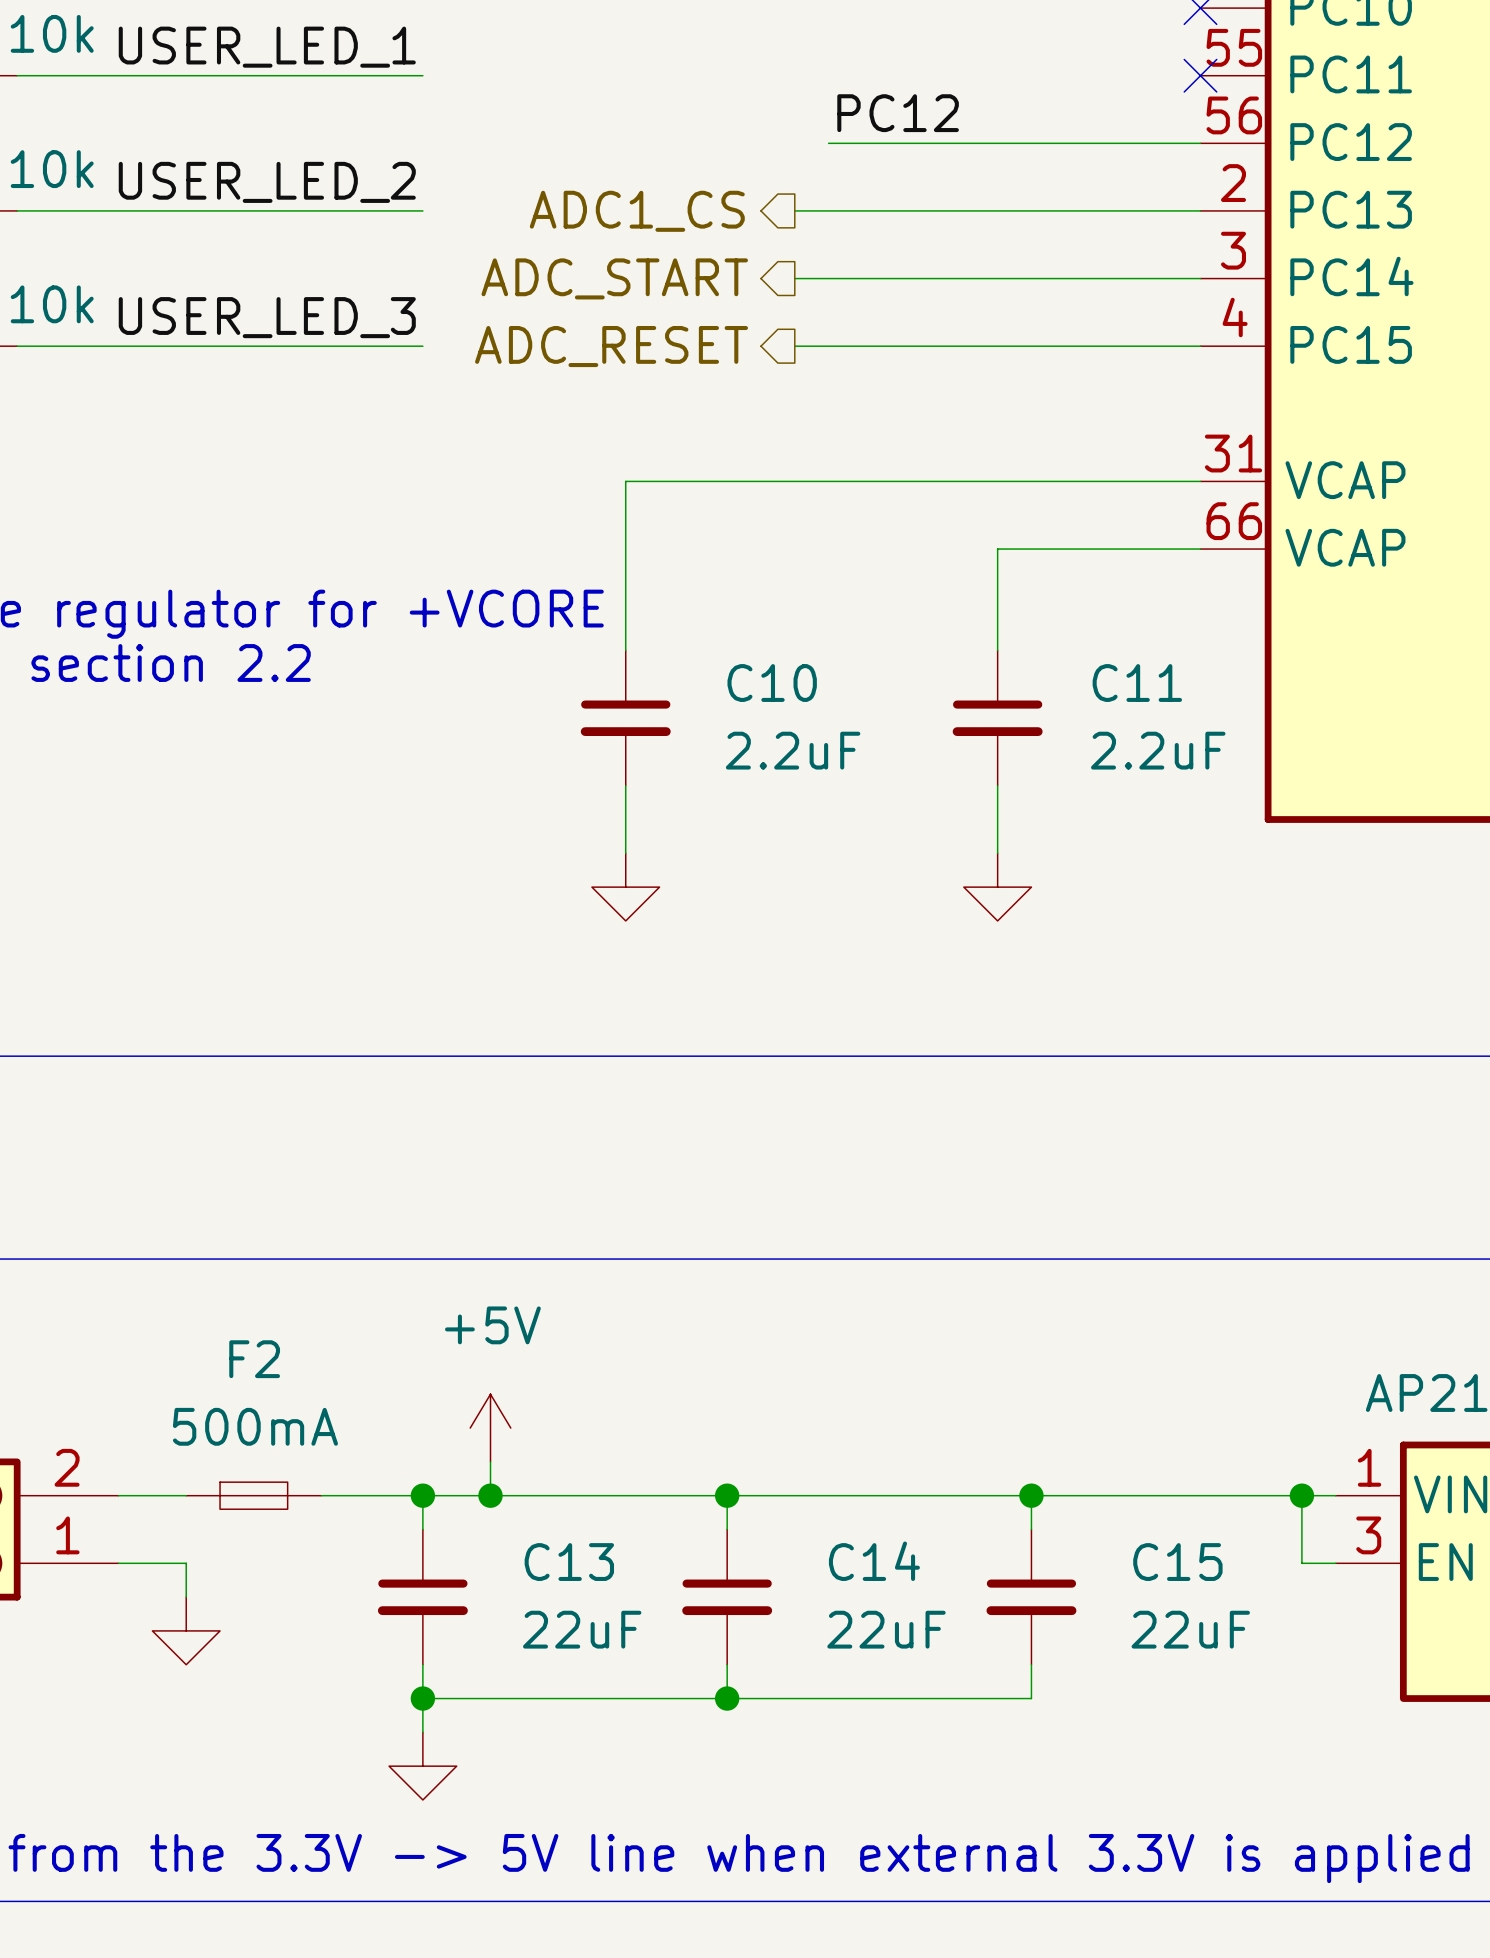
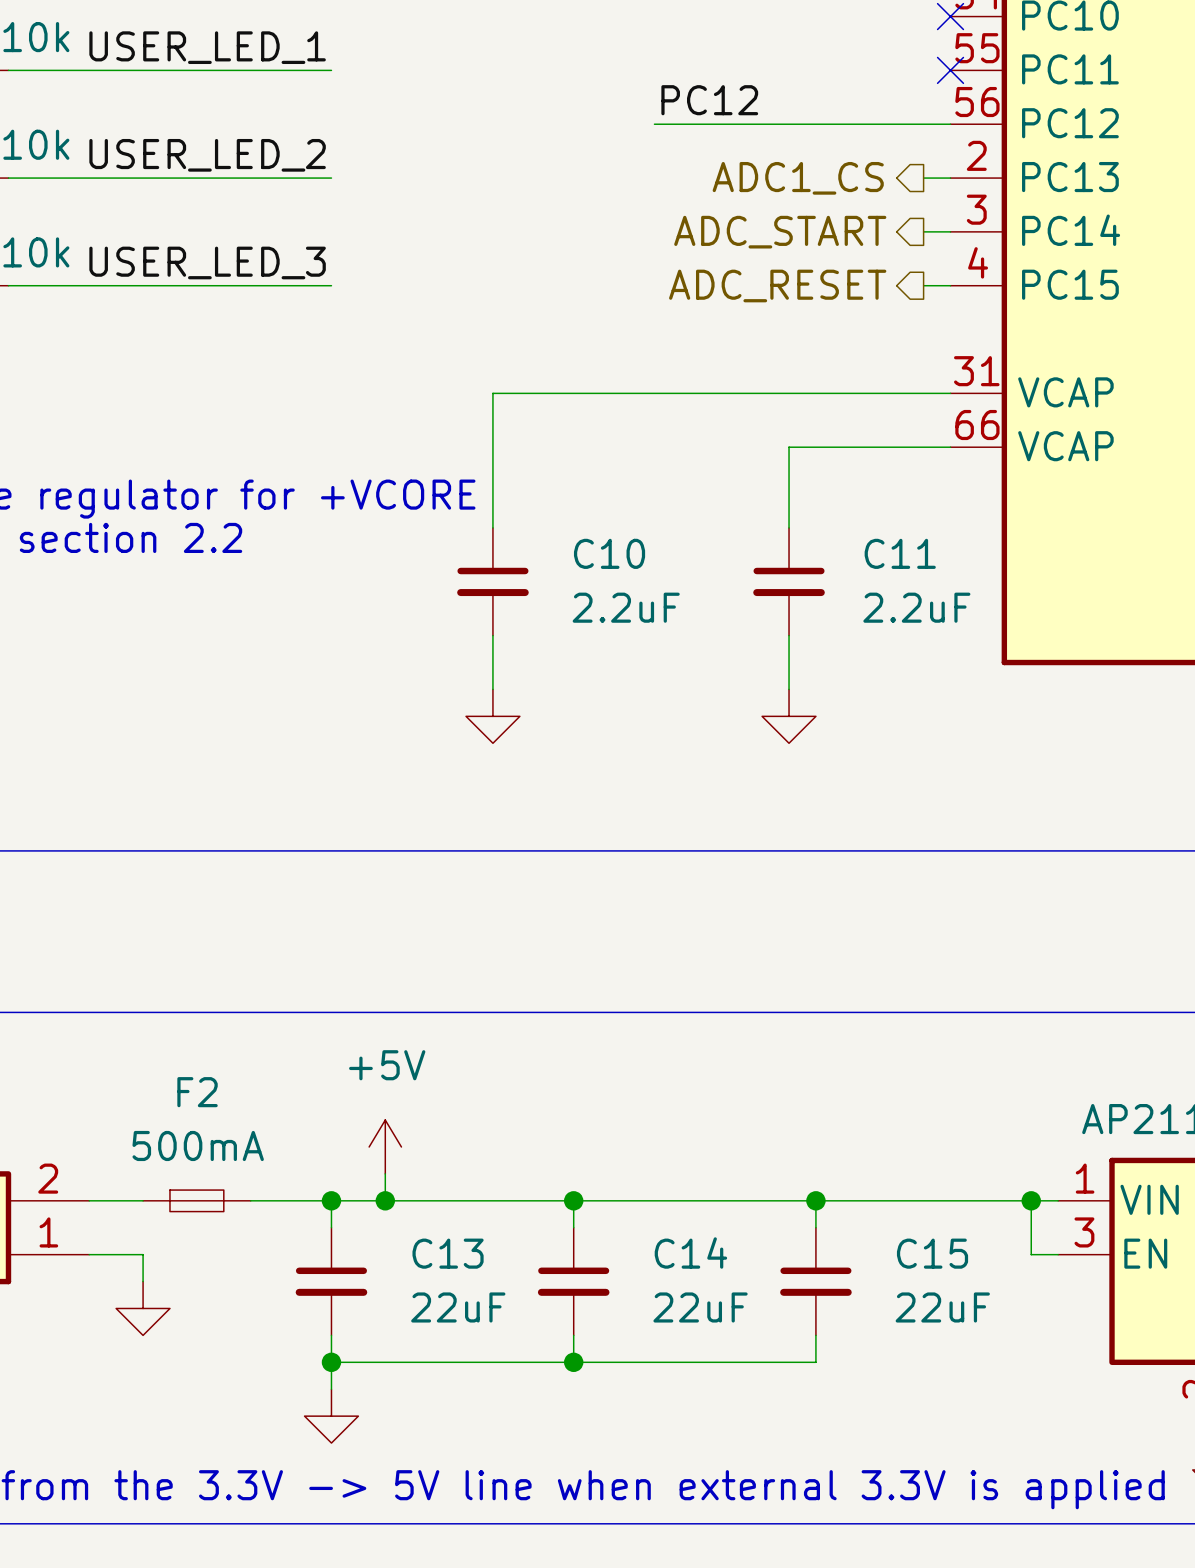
wire: (794, 210) (1166, 210) -> none
hierarchical label position: ADC1_CS (637, 211) -> ADC1_CS (798, 178)
hierarchical label position: ADC_START (614, 278) -> ADC_START (780, 232)
wire: (794, 278) (1166, 278) -> none
hierarchical label position: ADC_RESET (611, 346) -> ADC_RESET (777, 285)
wire: (794, 346) (1166, 346) -> none

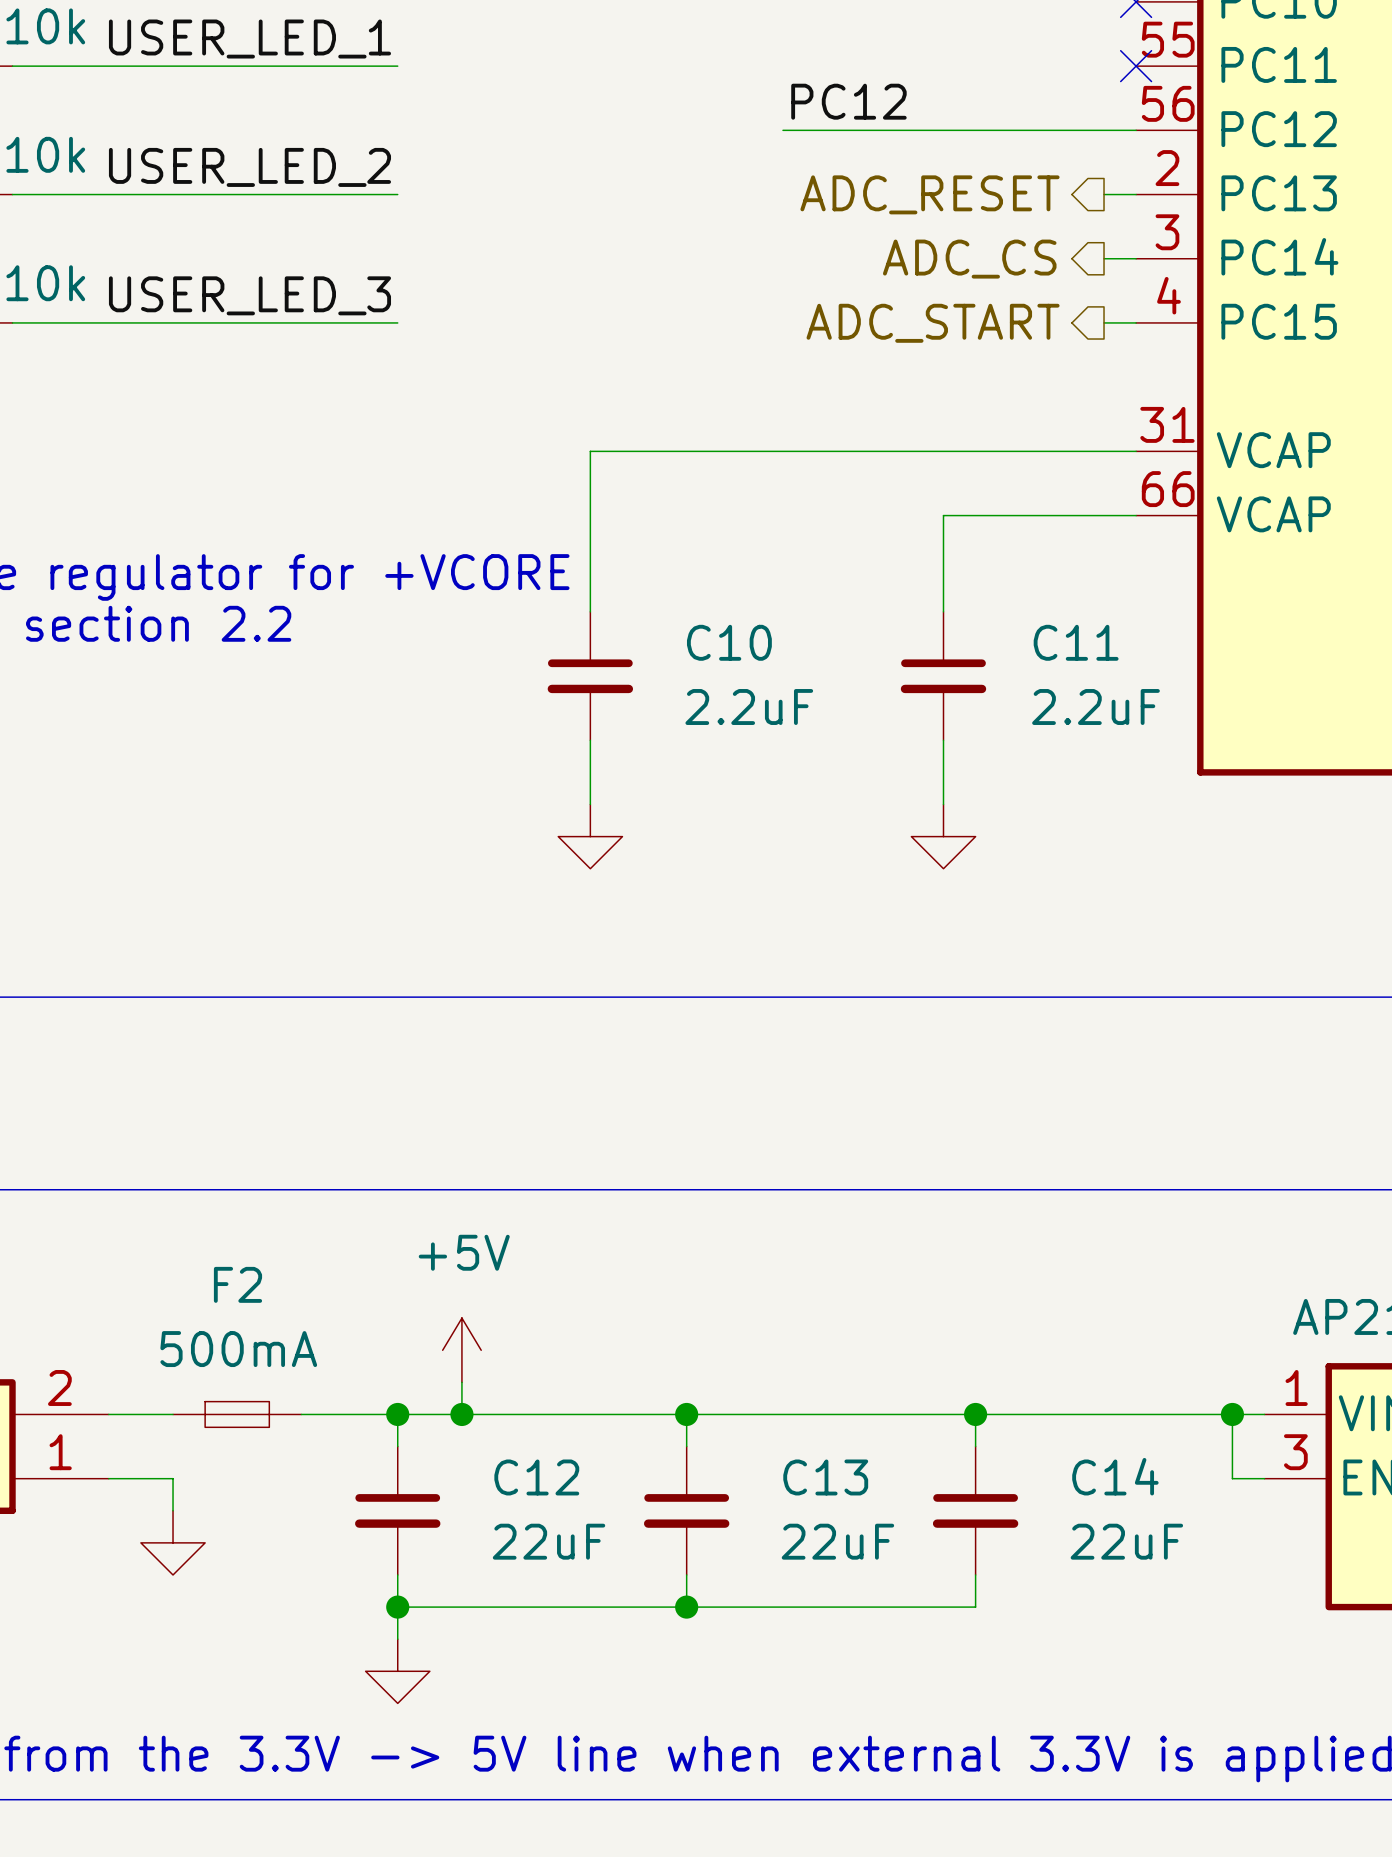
hierarchical label: ADC1_CS (798, 178) -> ADC_RESET (930, 194)
hierarchical label: ADC_START (780, 232) -> ADC_CS (969, 259)
hierarchical label: ADC_RESET (777, 285) -> ADC_START (933, 323)
C13 name: C13 (448, 1253) -> C12 (536, 1477)
C14 name: C14 (690, 1253) -> C13 (825, 1477)
C15 name: C15 (932, 1253) -> C14 (1115, 1476)

